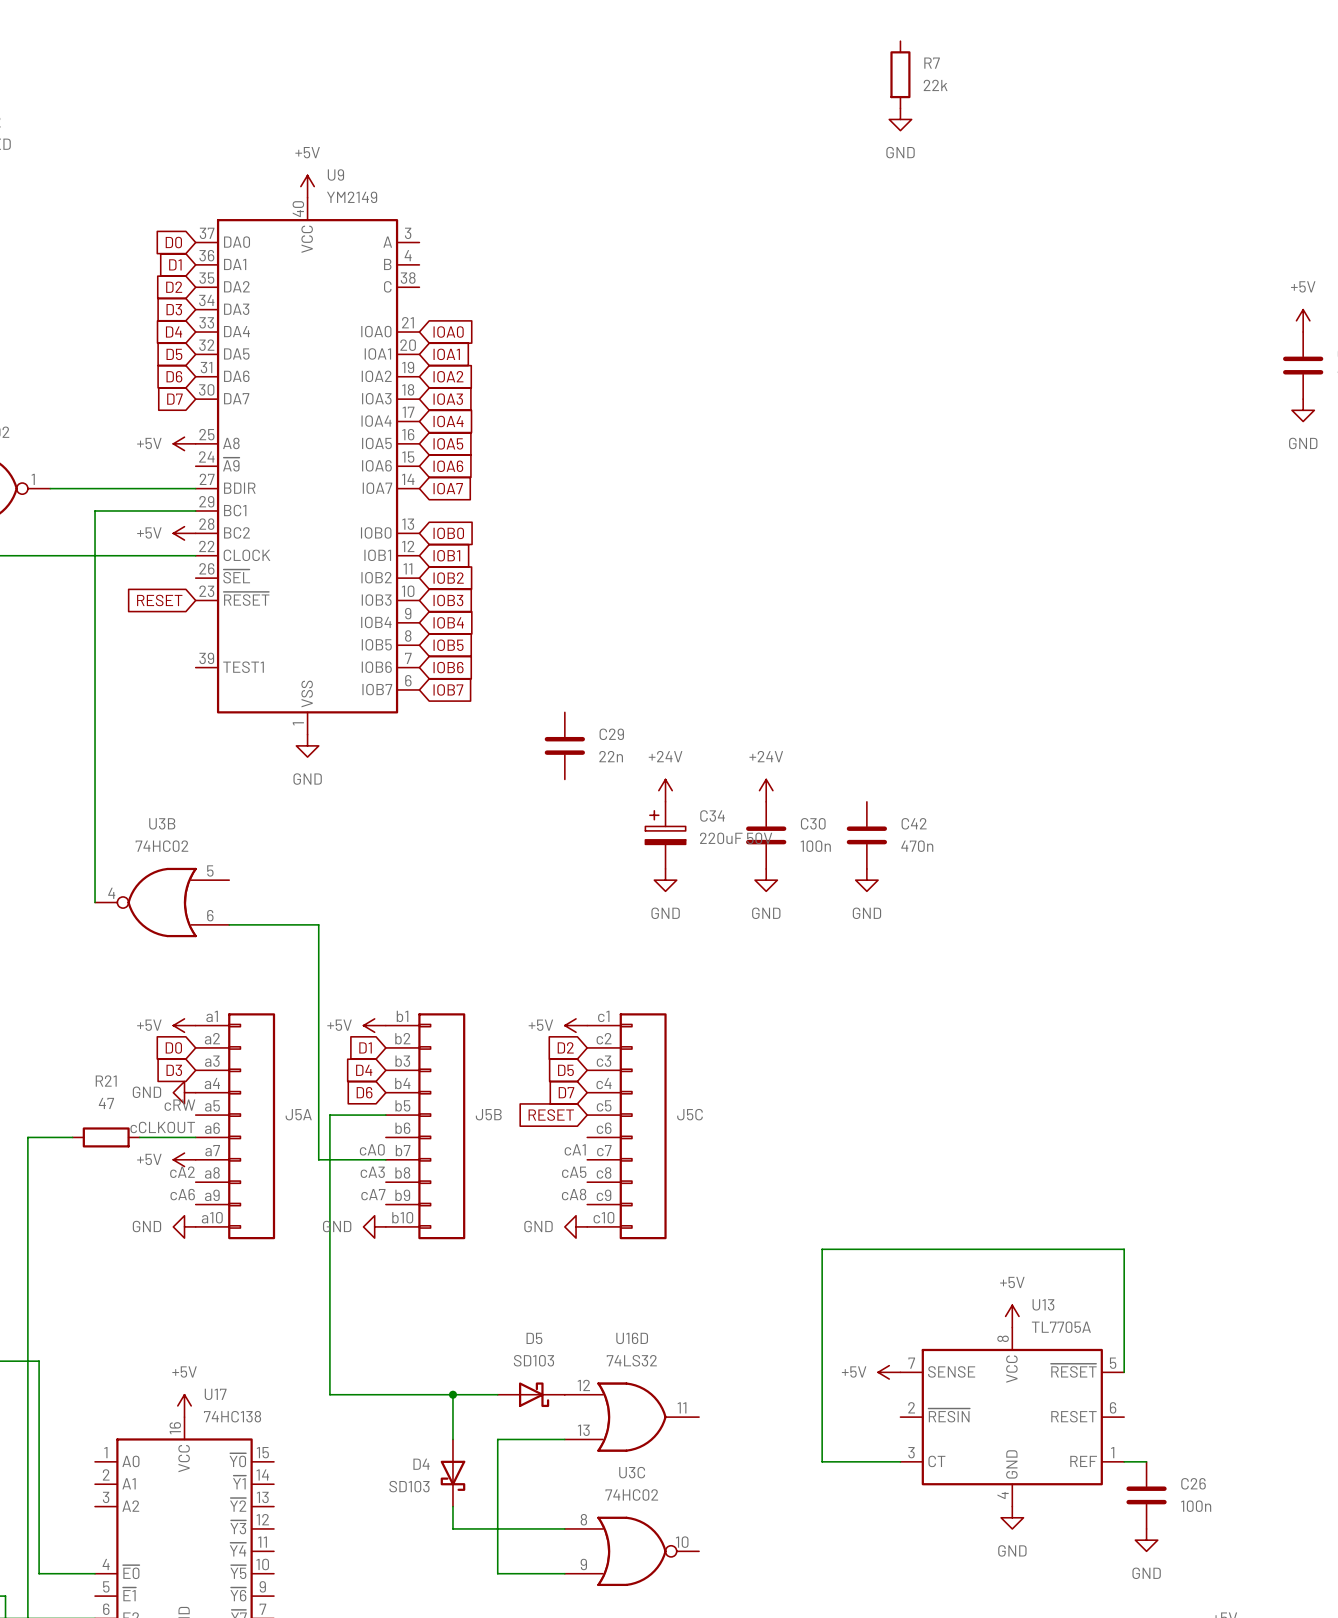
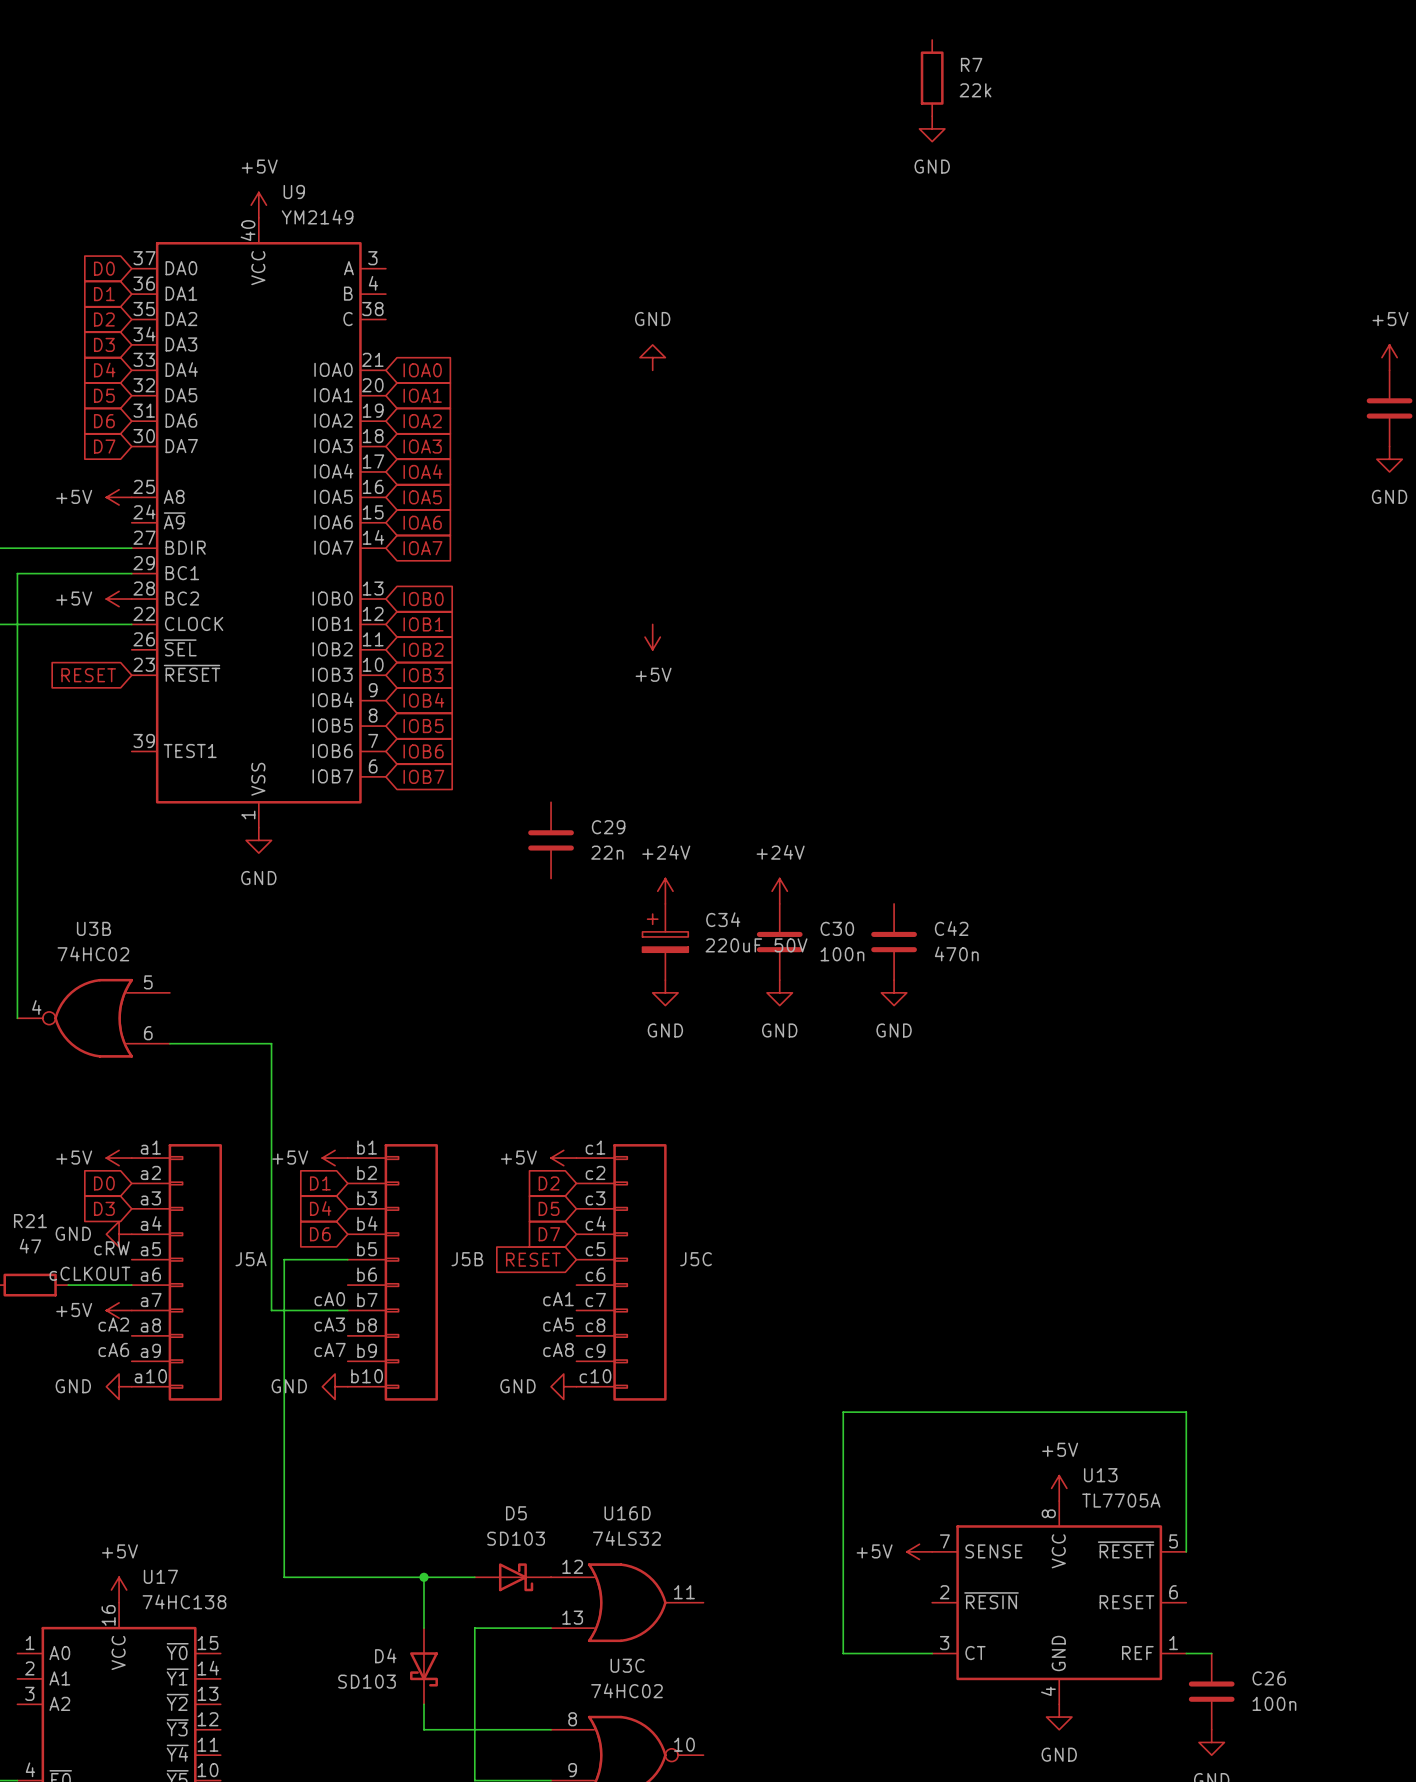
power symbol: none -> GND (652, 357)
power symbol: none -> +5V (652, 637)

